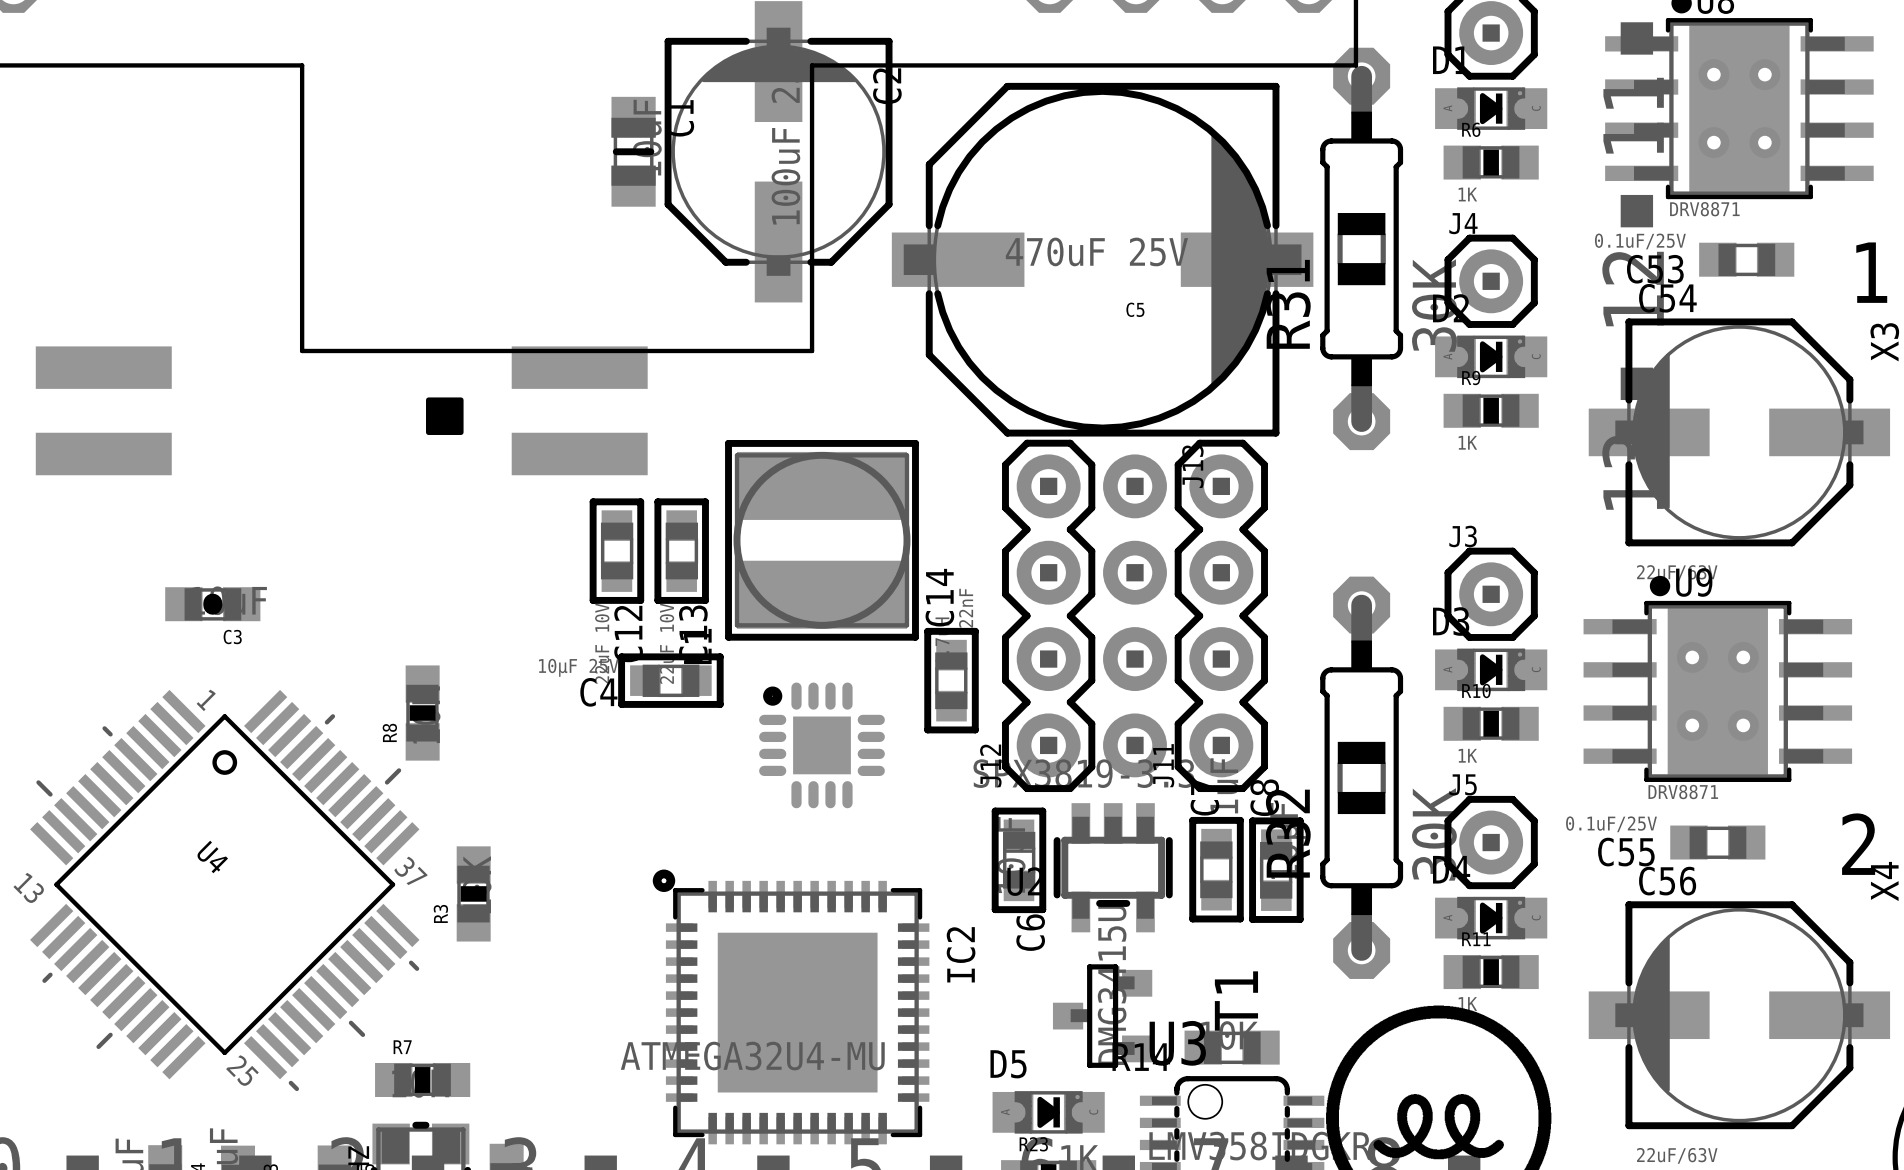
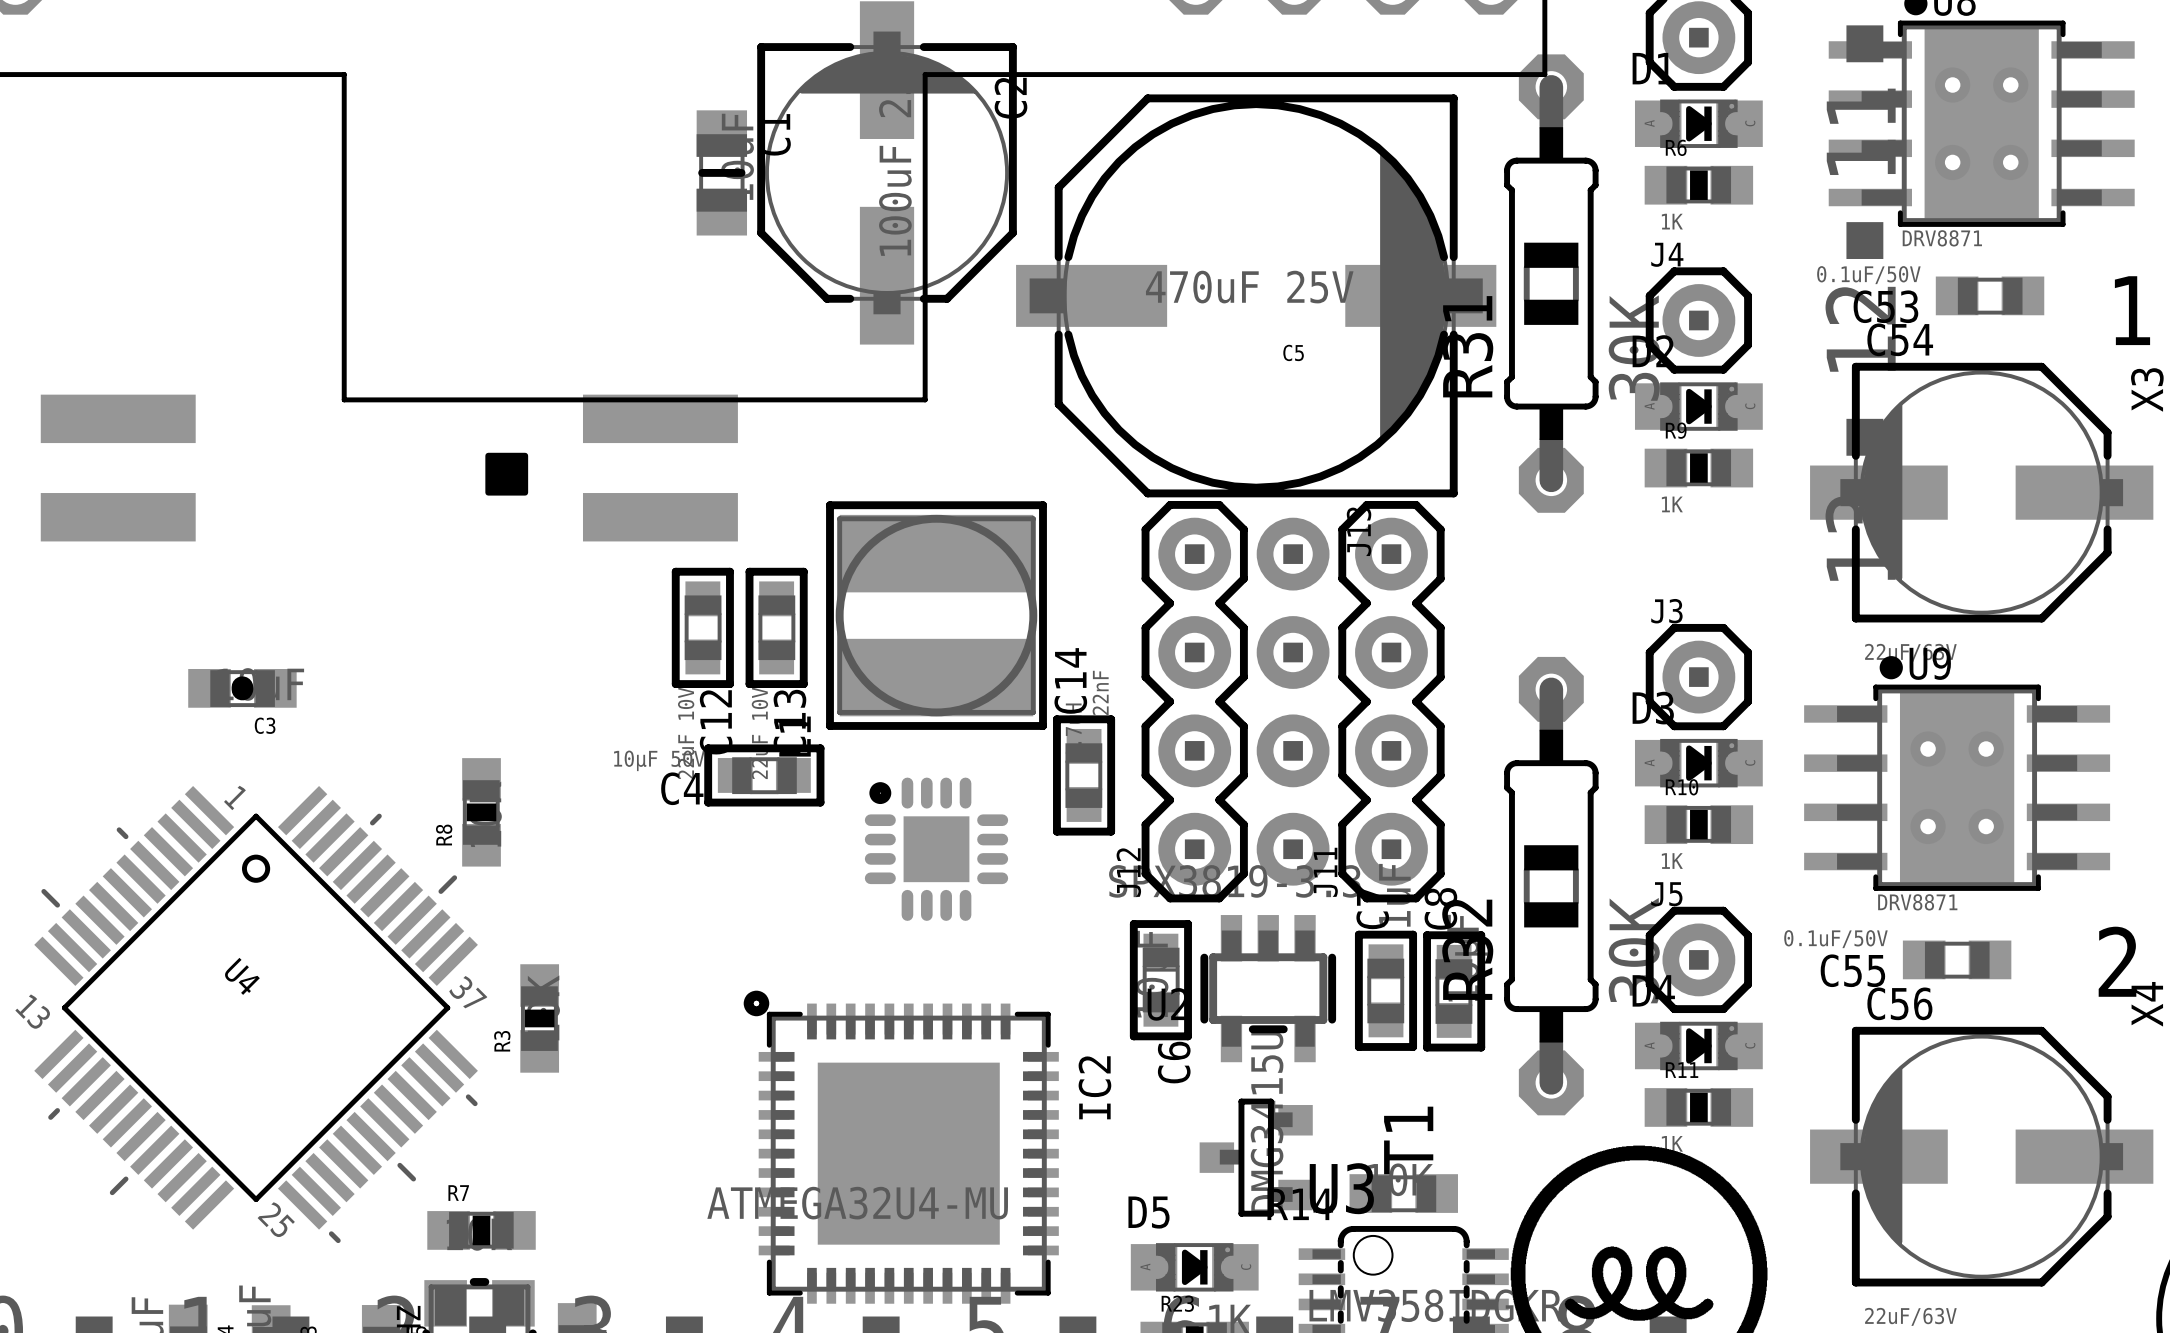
C53 value: 0.1uF/25V (1640, 241) -> 0.1uF/50V (1868, 275)
C4 value: 10µF 25V (578, 667) -> 10µF 50V (659, 760)
C55 value: 0.1uF/25V (1611, 824) -> 0.1uF/50V (1835, 939)

